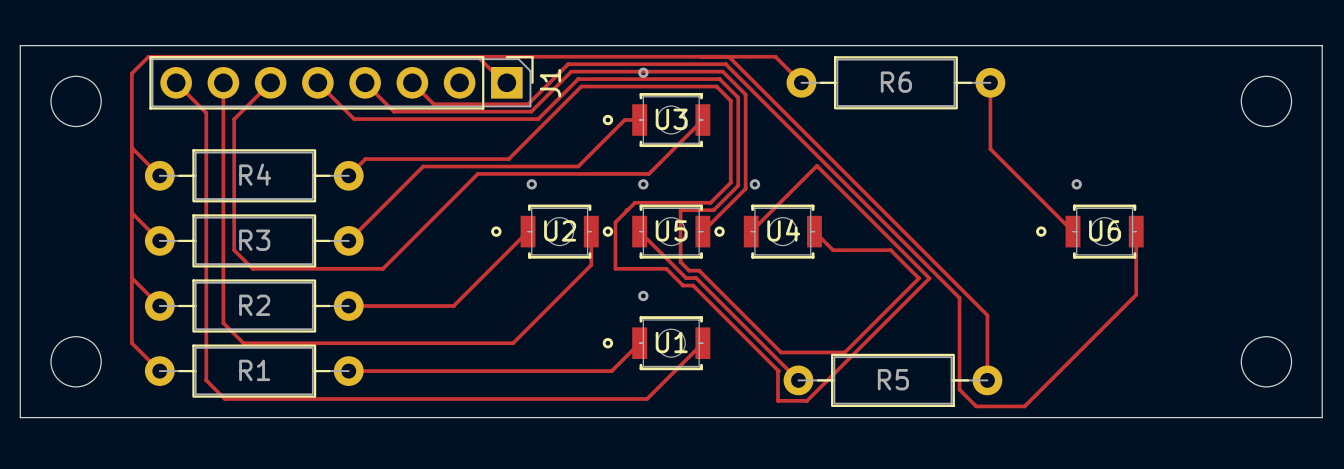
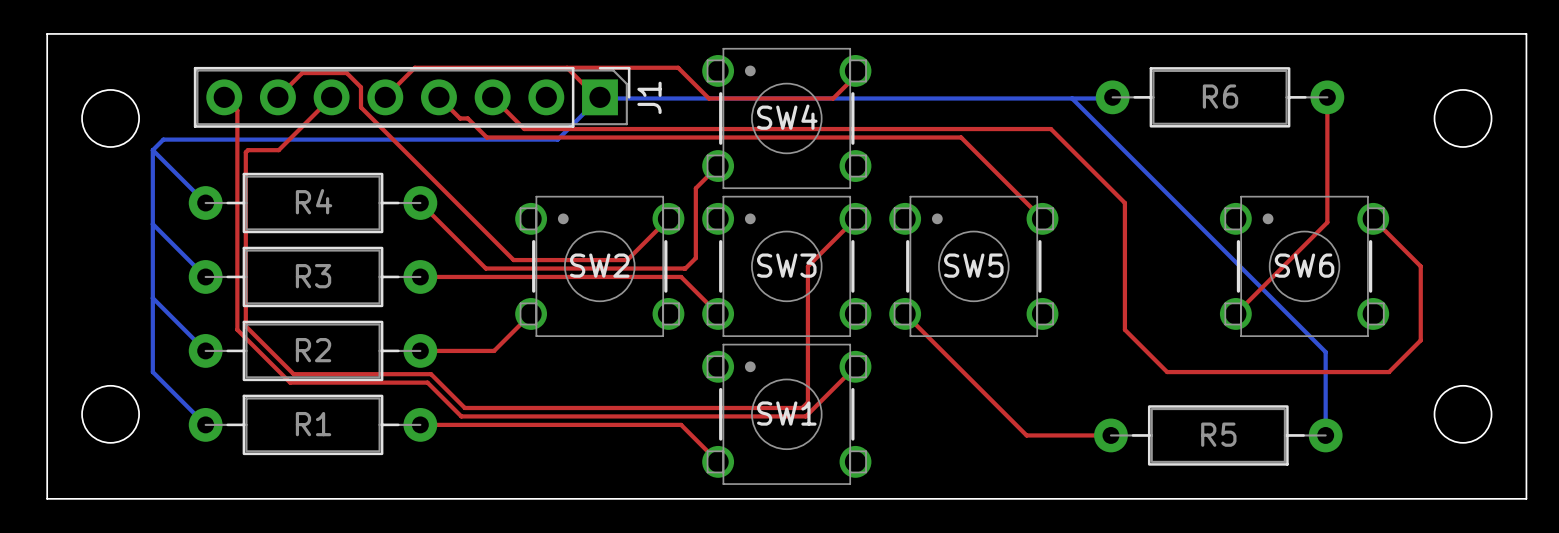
board edge: (20, 45) (1322, 45) -> (47, 55) (47, 33) (1526, 33) (1526, 55)
top track: (343, 56) (148, 56) (131, 73) (131, 343) (159, 371) -> (414, 67) (385, 97)
top track: (575, 56) (775, 56) (801, 82) -> (678, 67) (708, 98) (833, 98) (855, 76)
top track: (728, 56) (987, 315) (987, 380) -> none
top track: (223, 82) (223, 323) -> (237, 110) (237, 329) (277, 370)
top track: none -> (277, 97) (302, 73) (346, 73) (360, 87) (360, 107) (513, 260) (627, 260) (668, 218)
top track: (317, 82) (354, 119) (538, 119) (578, 79) (719, 79) (738, 97) (738, 185) (713, 210) (680, 210) (680, 262) (689, 270) (699, 270) (781, 352) (844, 352) (918, 278) (890, 250) (833, 250) (814, 231) -> none
R6 position: (895, 82) -> (1220, 97)
bottom track: none -> (1112, 97) (599, 97) (557, 139) (163, 139) (152, 150)
top track: (990, 82) (990, 149) (1072, 231) -> none
top track: none -> (1327, 97) (1327, 222) (1235, 313)
bottom track: none -> (1072, 98) (1325, 352) (1325, 435)
top track: (187, 94) (206, 112) (206, 380) (224, 398) (647, 398) (702, 343) -> none
top track: (383, 101) (393, 111) (531, 111) (571, 71) (722, 71) (745, 94) (745, 188) (702, 231) -> (460, 118) (467, 118) (486, 137) (961, 137) (1042, 218)
SW4: none -> (786, 118)
top track: (433, 104) (528, 104) (568, 64) (725, 64) (959, 297) (959, 389) (976, 406) (1024, 406) (1136, 294) (1136, 231) -> (516, 121) (524, 129) (1050, 129) (1124, 203) (1124, 329) (1167, 372) (1389, 372) (1420, 340) (1420, 266) (1373, 218)
U3: (656, 107) -> none
top track: (234, 119) (234, 250) (252, 268) (382, 268) (477, 173) (648, 173) (702, 120) -> (290, 138) (278, 150) (247, 150) (245, 152) (245, 326) (293, 374) (431, 374) (464, 407) (802, 407) (807, 402) (807, 266) (855, 218)
top track: (639, 120) (624, 120) (578, 166) (423, 166) (348, 240) -> (718, 313) (681, 276) (420, 276)
bottom track: none -> (152, 150) (152, 372) (205, 424)
bottom track: none -> (152, 150) (205, 203)
top track: (131, 147) (159, 175) -> none
top track: (348, 175) (365, 159) (508, 159) (581, 86) (716, 86) (730, 100) (730, 182) (710, 202) (634, 202) (615, 222) (615, 268) (666, 268) (683, 285) (693, 285) (778, 371) (778, 400) (806, 400) (929, 278) (816, 165) (751, 231) -> (420, 203) (485, 268) (685, 268) (695, 258) (695, 188) (718, 166)
bottom track: none -> (152, 224) (205, 276)
top track: (131, 213) (159, 240) -> none
U2: (544, 218) -> none
U5: (656, 218) -> none
U4: (768, 218) -> none
U6: (1089, 218) -> none
SW2: none -> (599, 266)
top track: (528, 231) (453, 306) (413, 306) -> (531, 313) (494, 350)
top track: (591, 231) (591, 265) (513, 343) (243, 343) (234, 333) -> (855, 366) (805, 416) (461, 416) (427, 382) (290, 382)
top track: (639, 231) (686, 278) (696, 278) (798, 380) -> none
SW3: none -> (786, 266)
SW5: none -> (973, 266)
SW6: none -> (1304, 266)
bottom track: none -> (152, 298) (205, 350)
top track: none -> (905, 313) (1026, 435) (1110, 435)
top track: (131, 278) (159, 306) -> none
U1: (656, 330) -> none
top track: (639, 343) (611, 371) (578, 371) -> (718, 461) (681, 424)
SW1: none -> (786, 414)
R5 position: (892, 380) -> (1218, 435)
board edge: (20, 417) (1322, 417) -> (47, 477) (47, 498) (1526, 498) (1526, 477)

